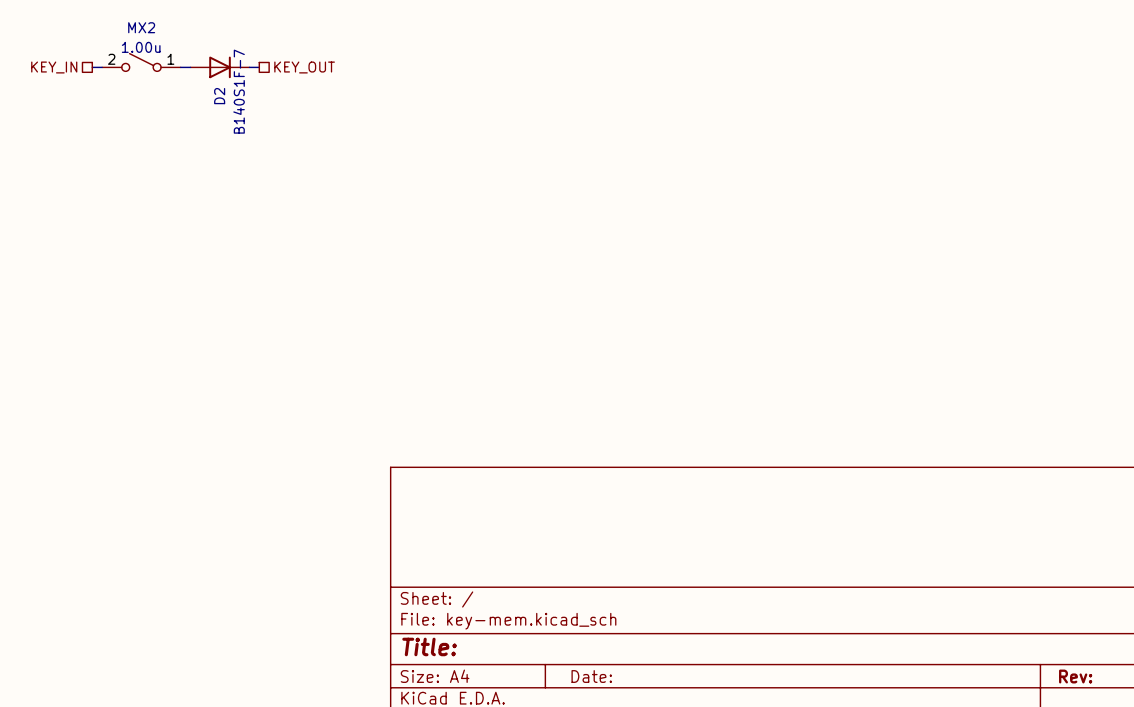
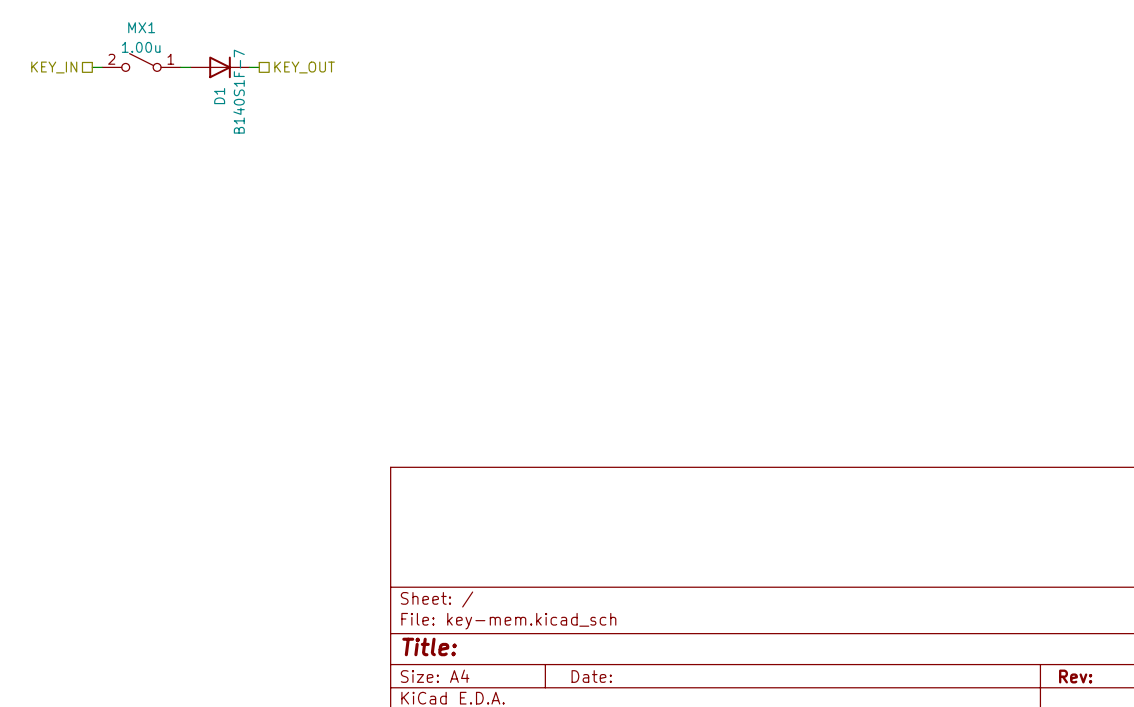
MX2 name: MX2 (141, 27) -> MX1 (141, 27)
D2 name: D2 (219, 96) -> D1 (219, 96)

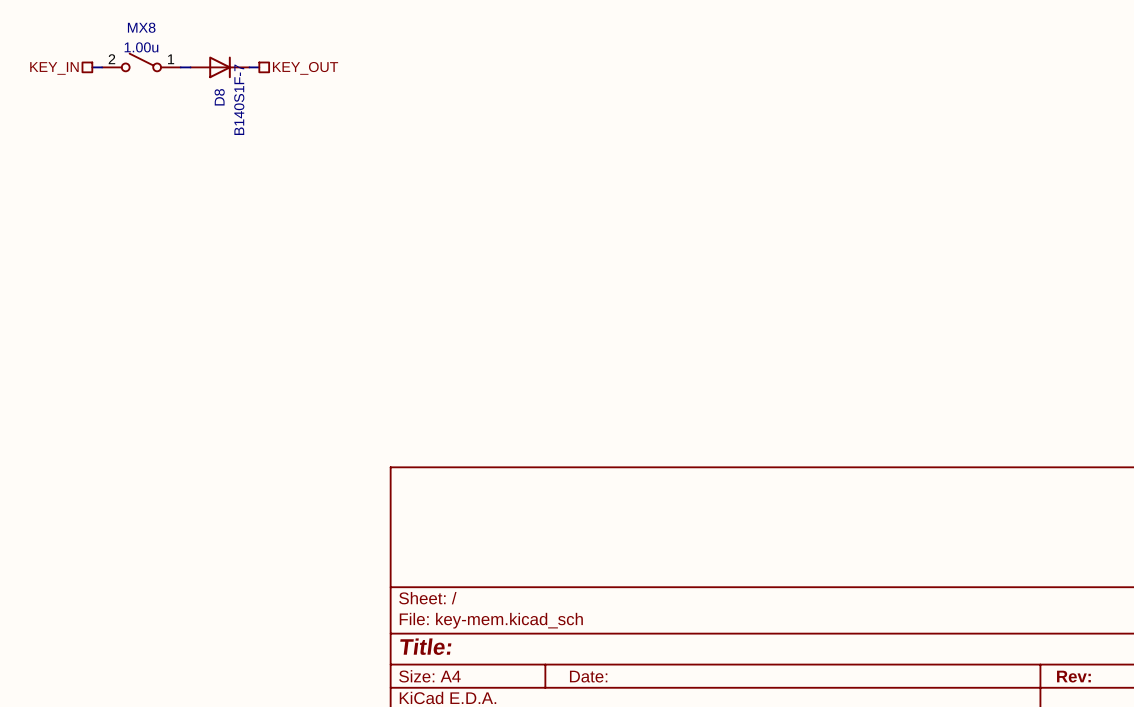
MX1 name: MX1 (141, 27) -> MX8 (141, 27)
D1 name: D1 (219, 96) -> D8 (219, 97)

